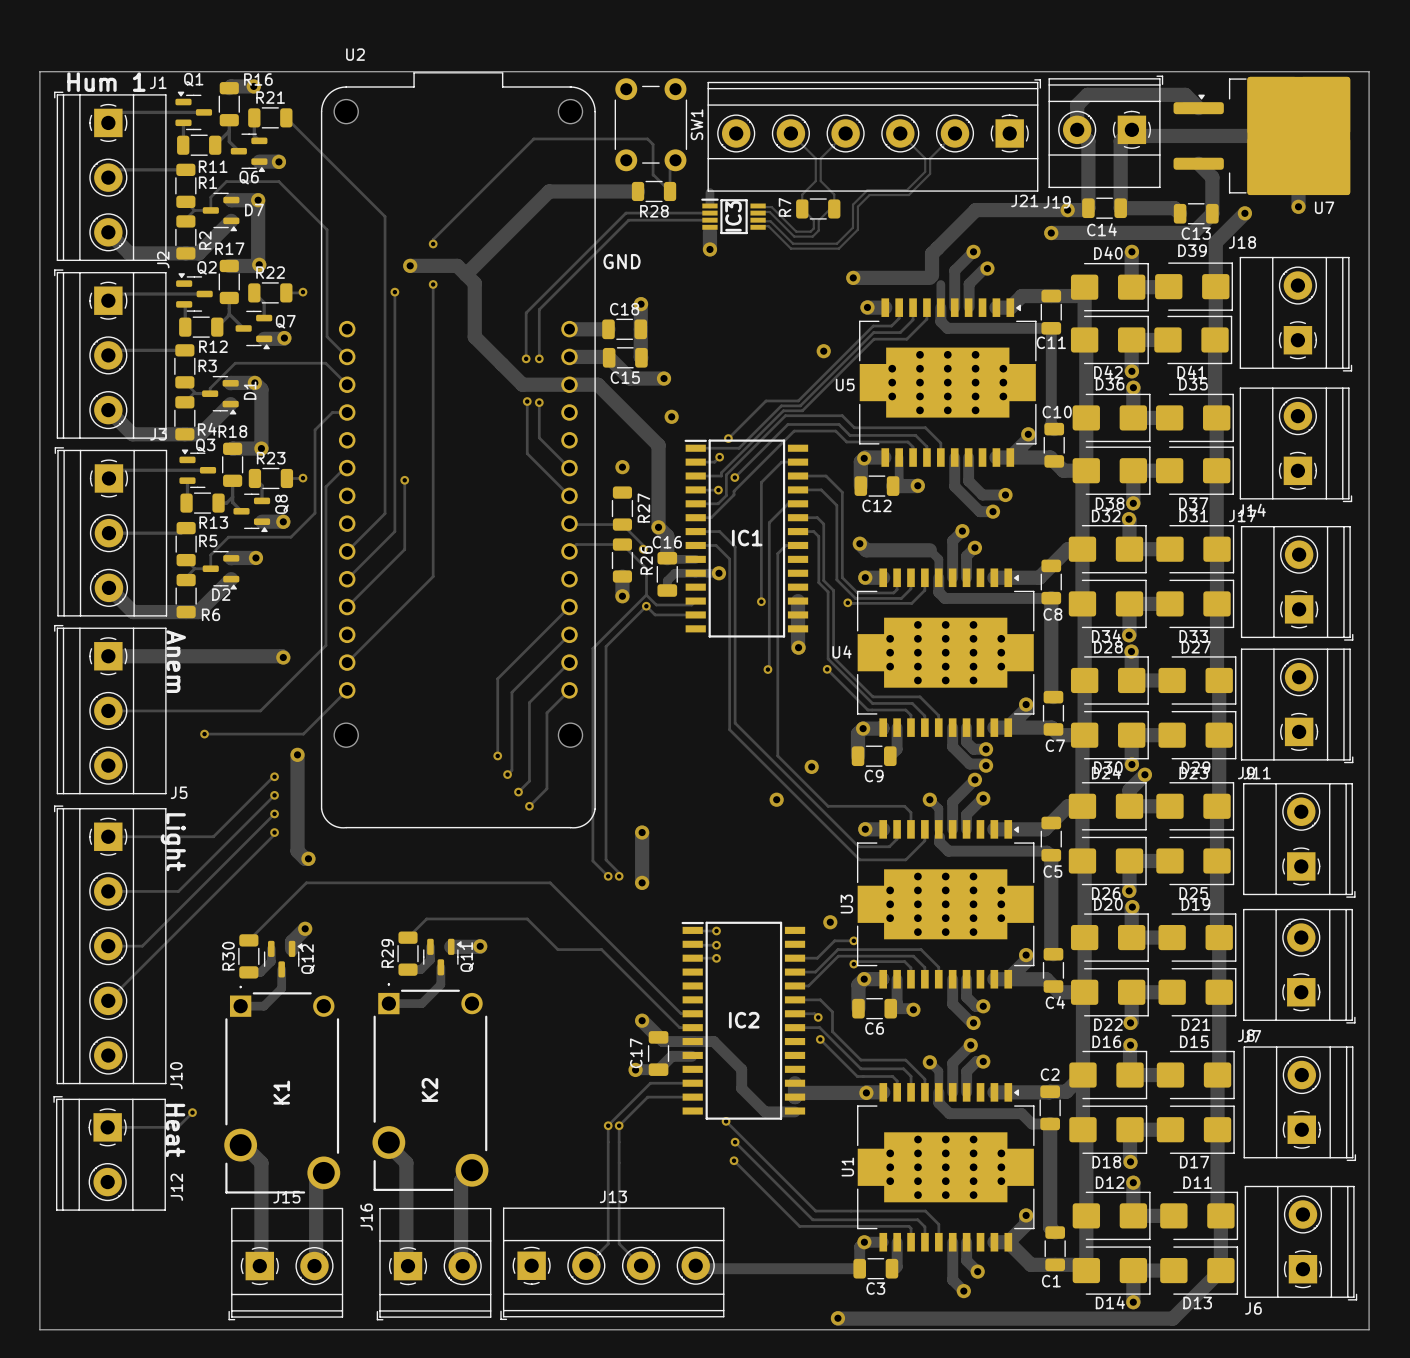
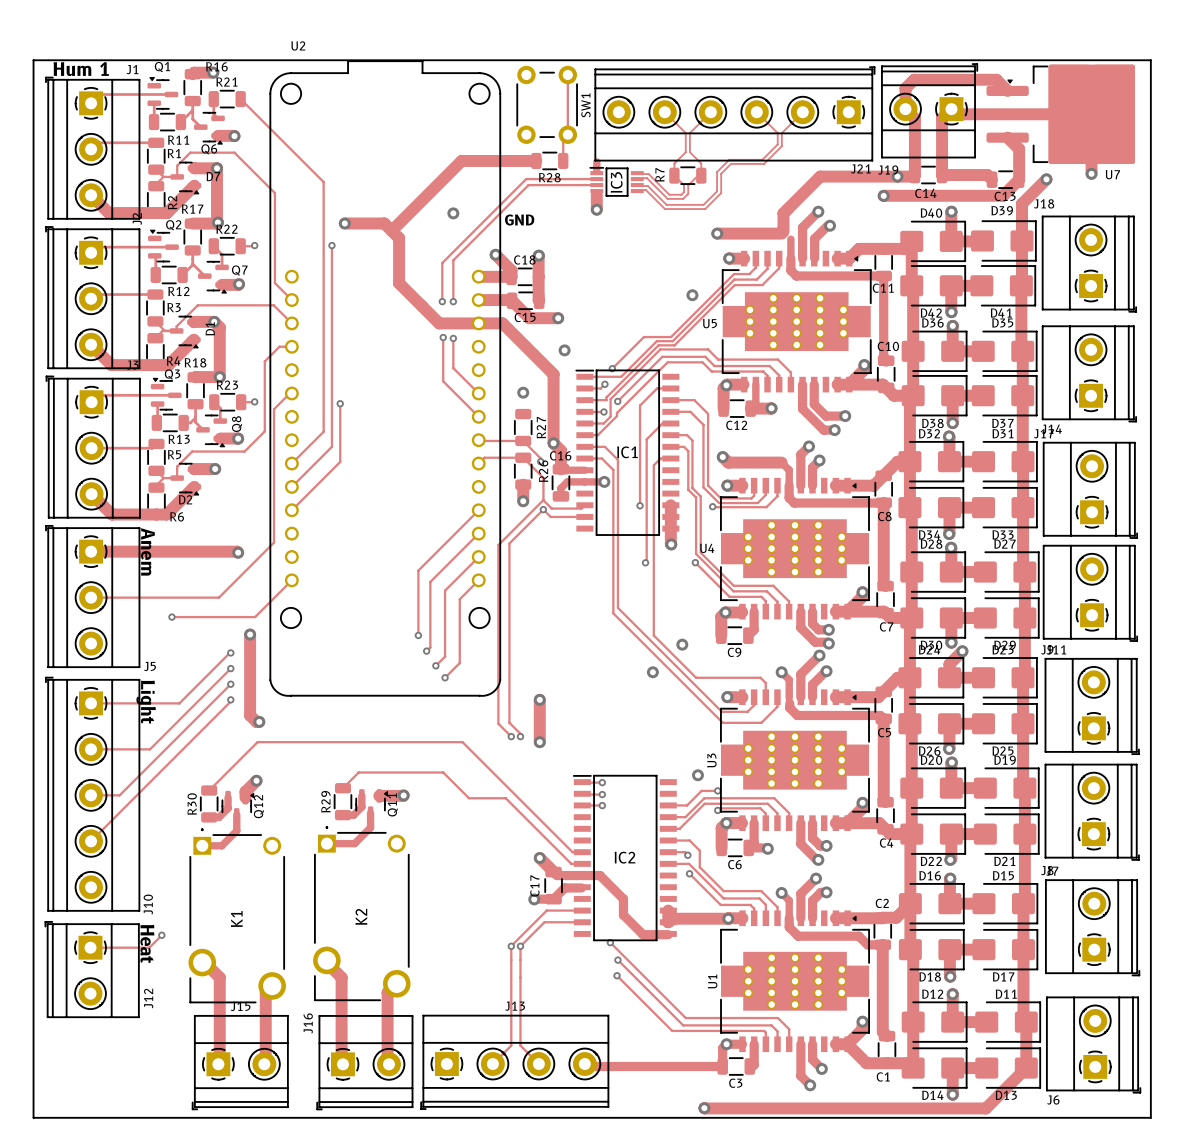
track: none -> (567, 74) (567, 134)
track: (670, 191) (653, 175) (653, 144) (647, 138) (533, 138) (433, 239) (433, 243) -> none
via: (433, 243) -> none
via: none -> (453, 213)
track: (433, 284) (433, 576) (347, 662) -> none
via: (433, 284) -> none
track: none -> (495, 254) (511, 270) (511, 276)
via: none -> (495, 254)

